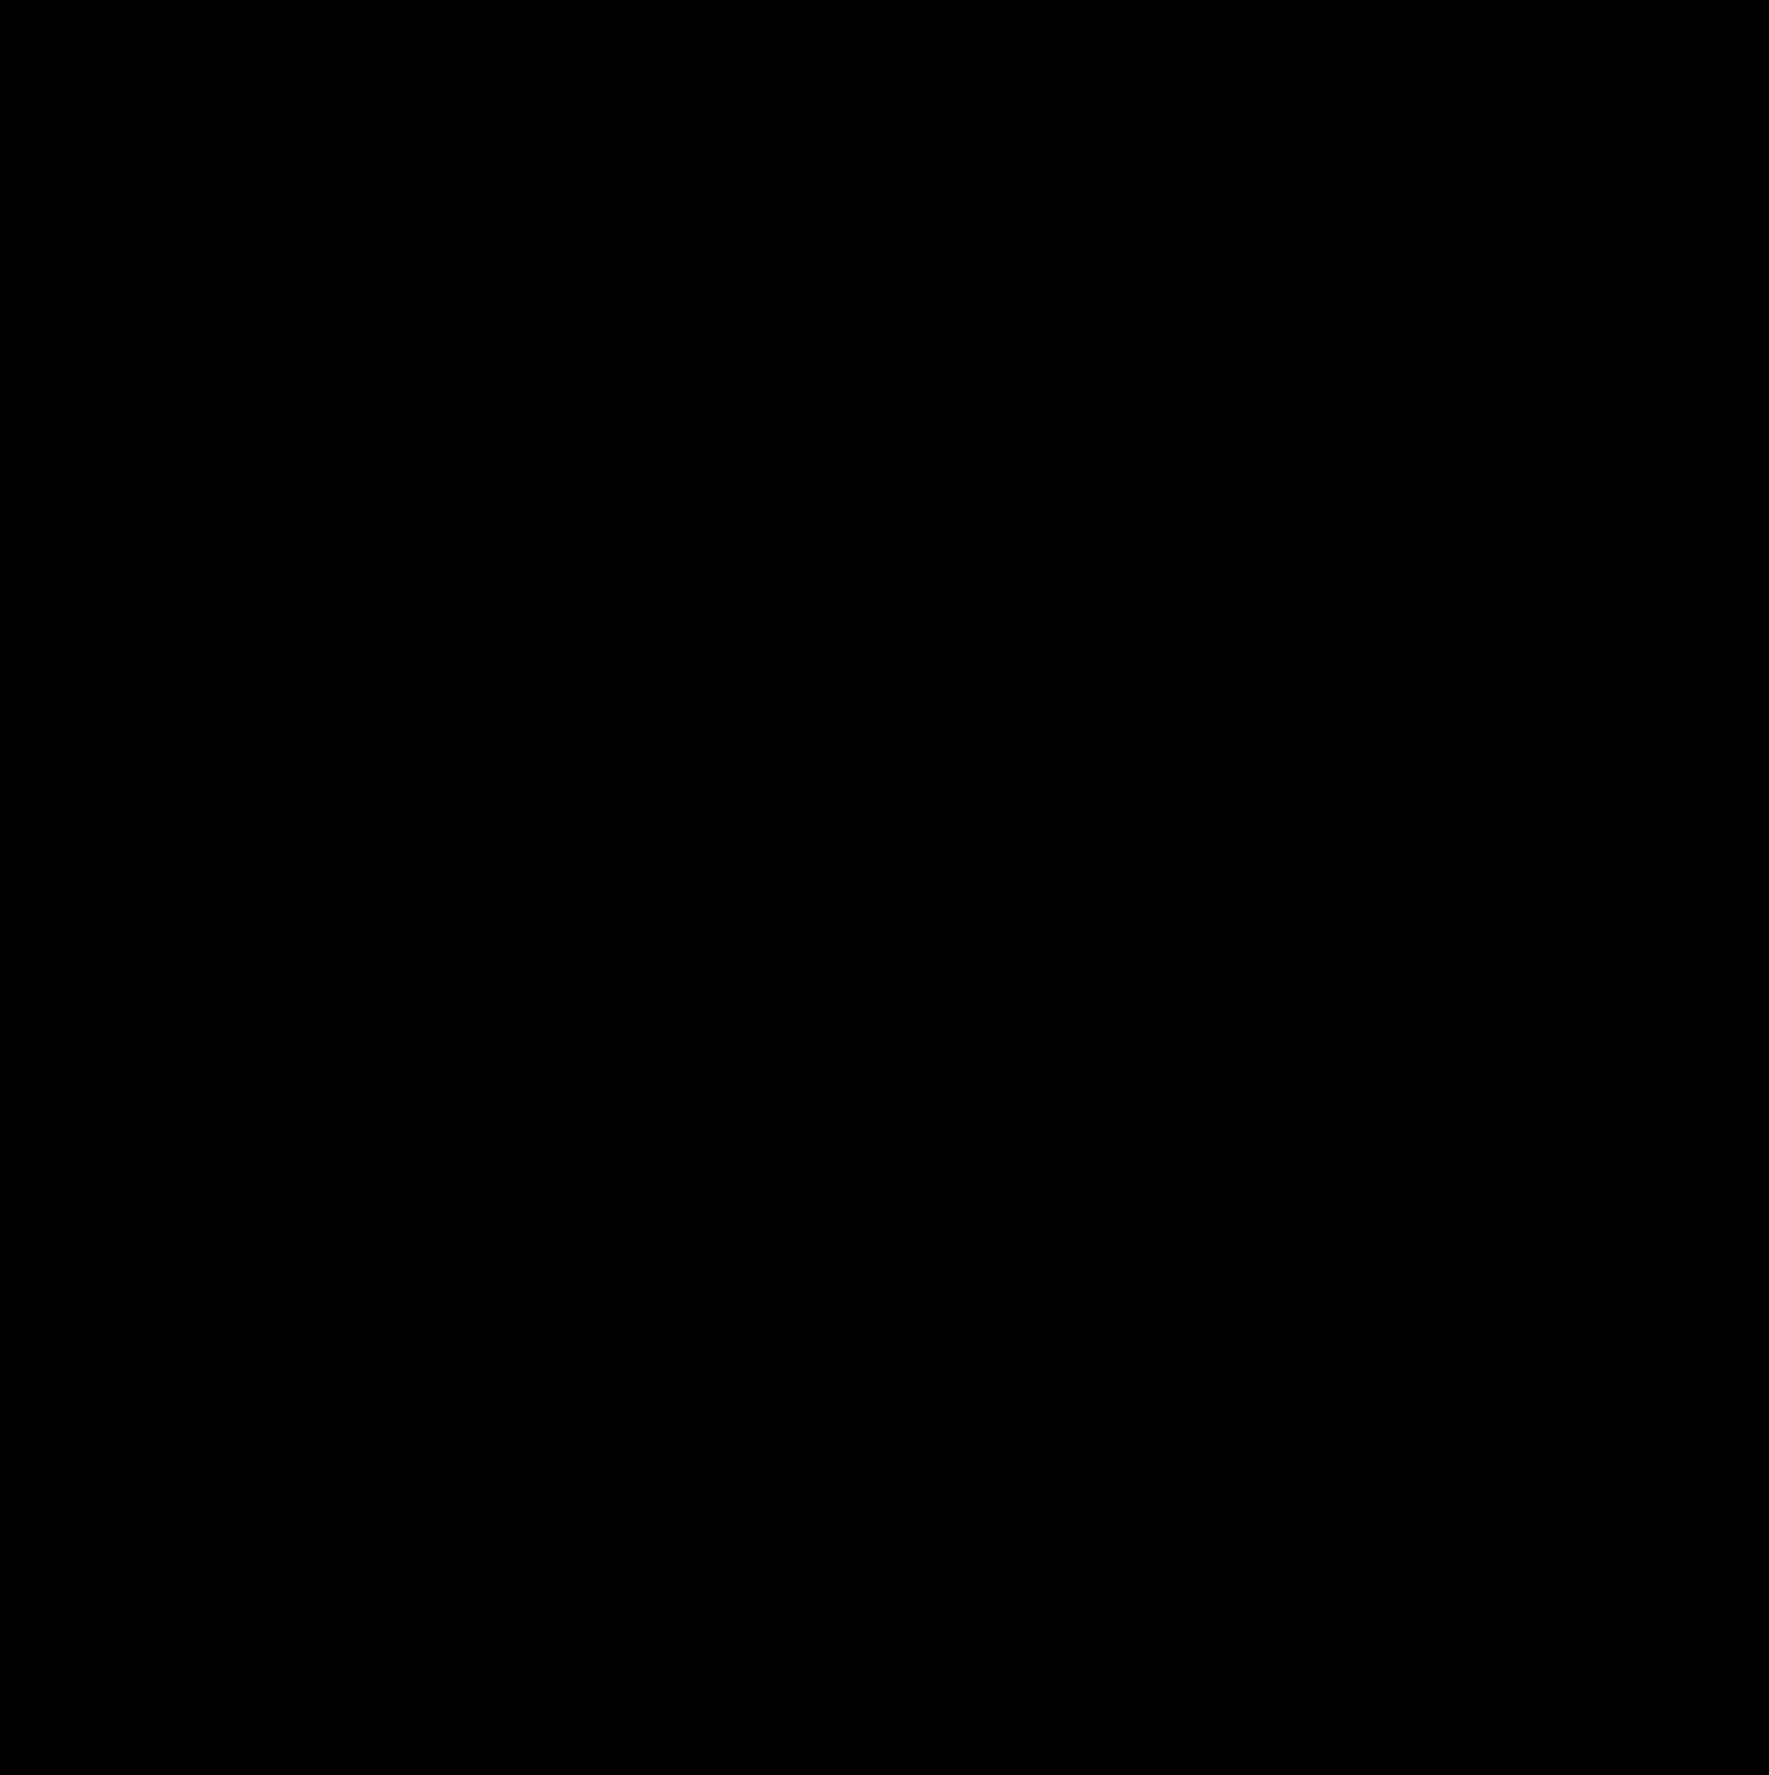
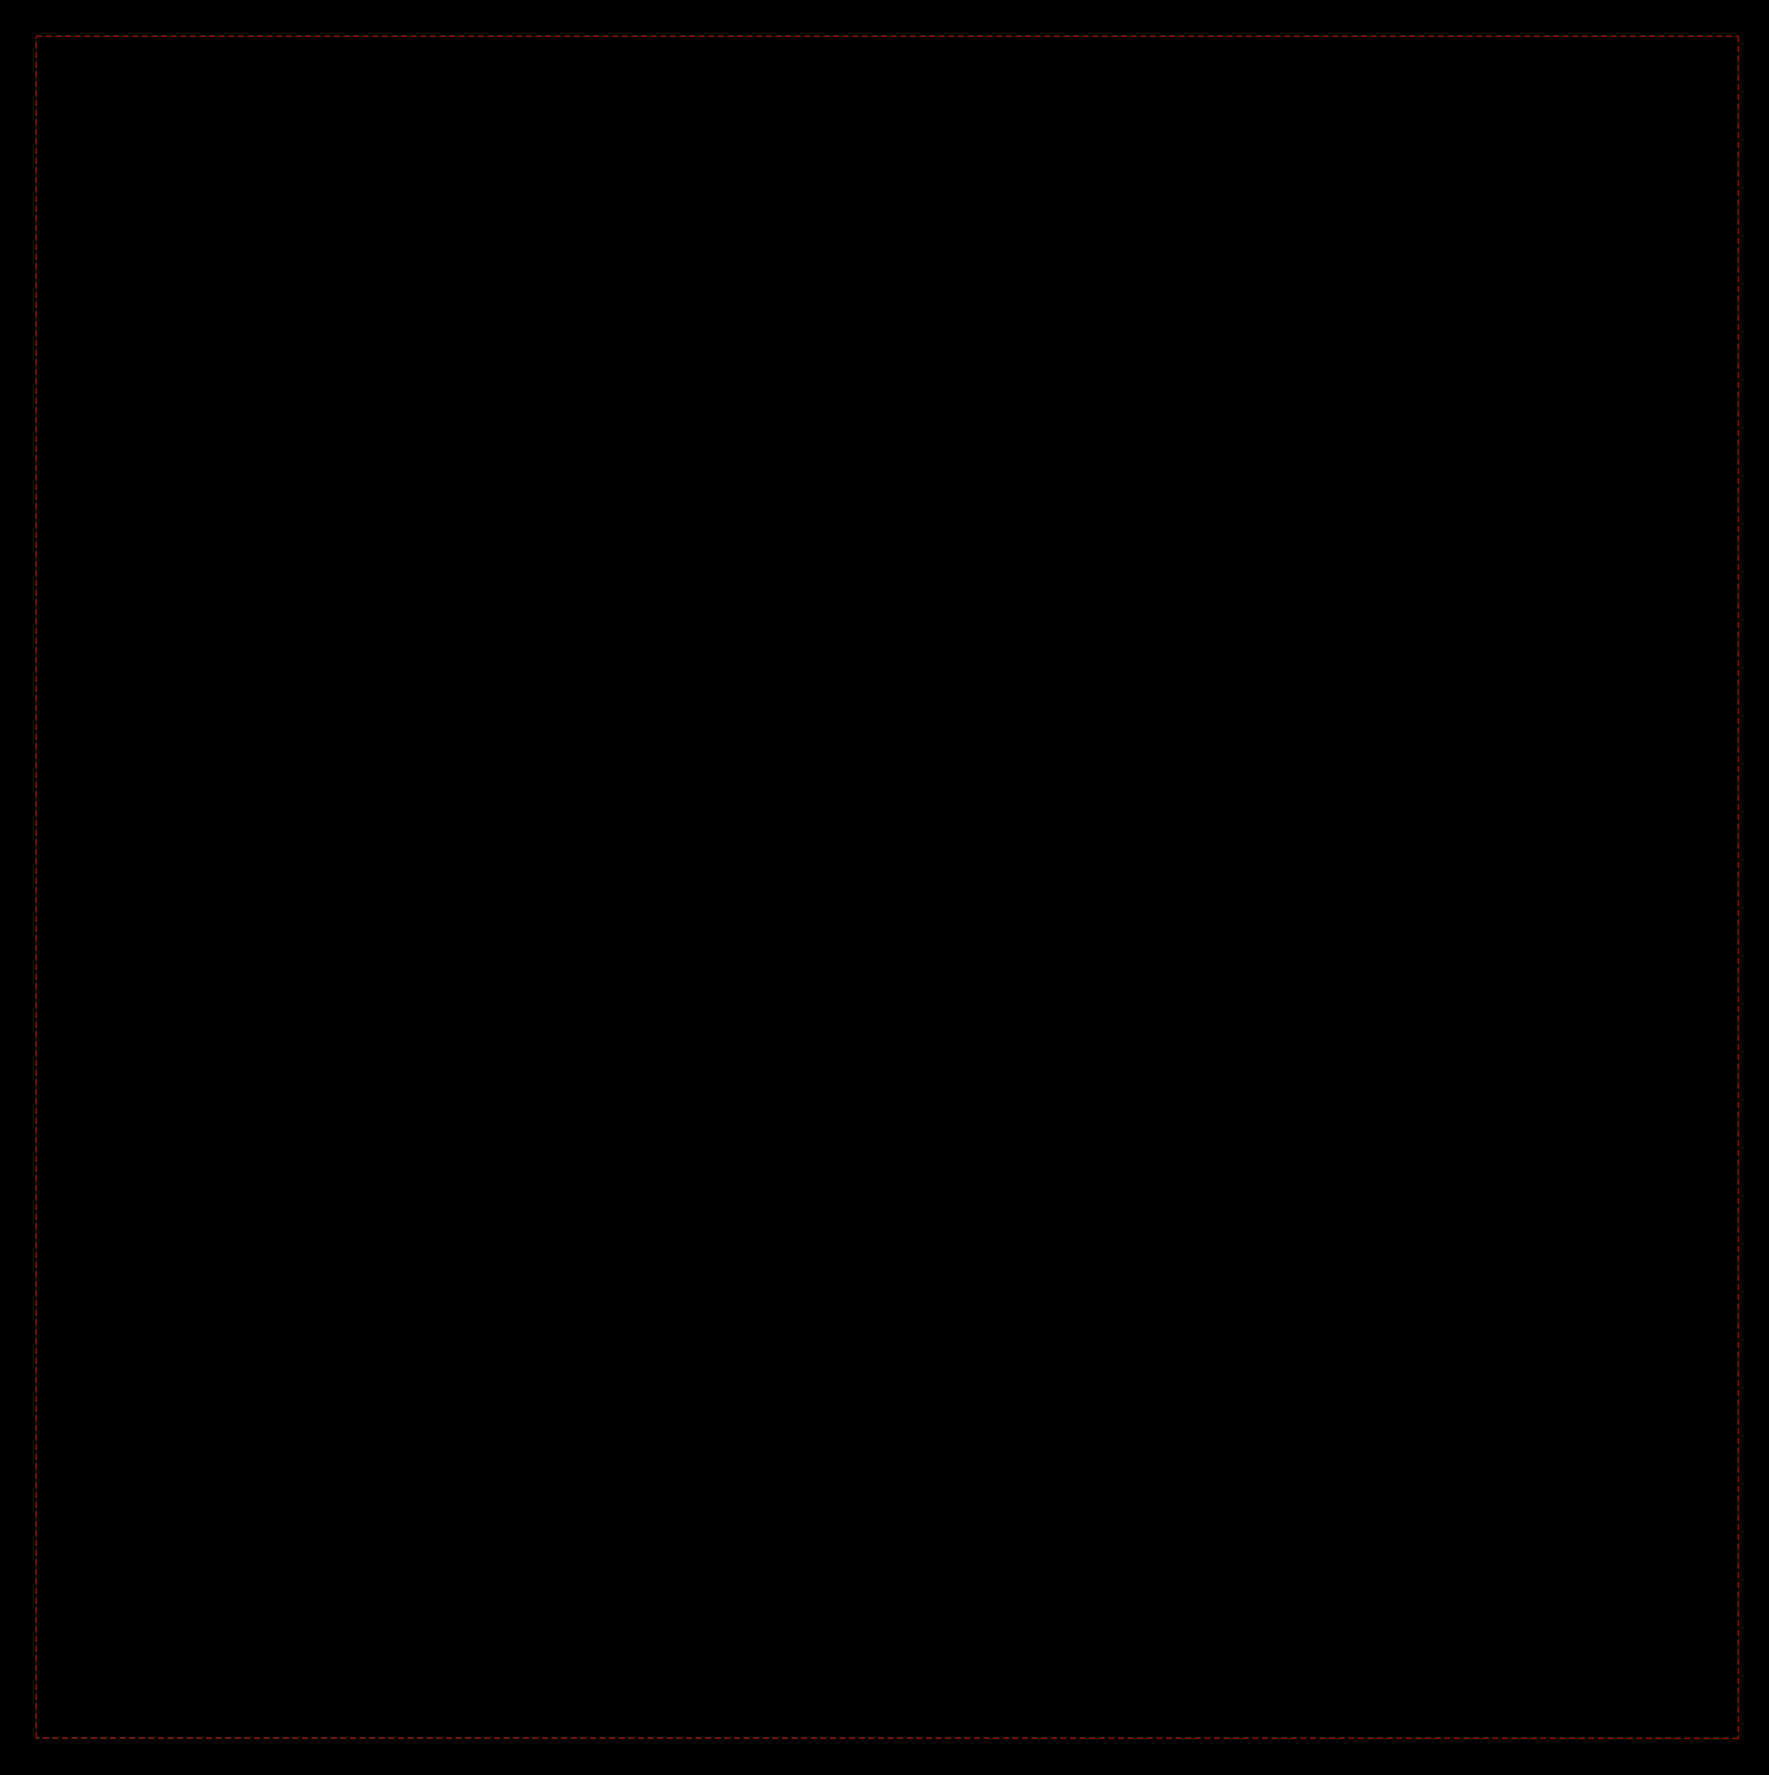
top zone outline: none -> (36, 36) (36, 1738) (1738, 1738) (1738, 36) (36, 36)

